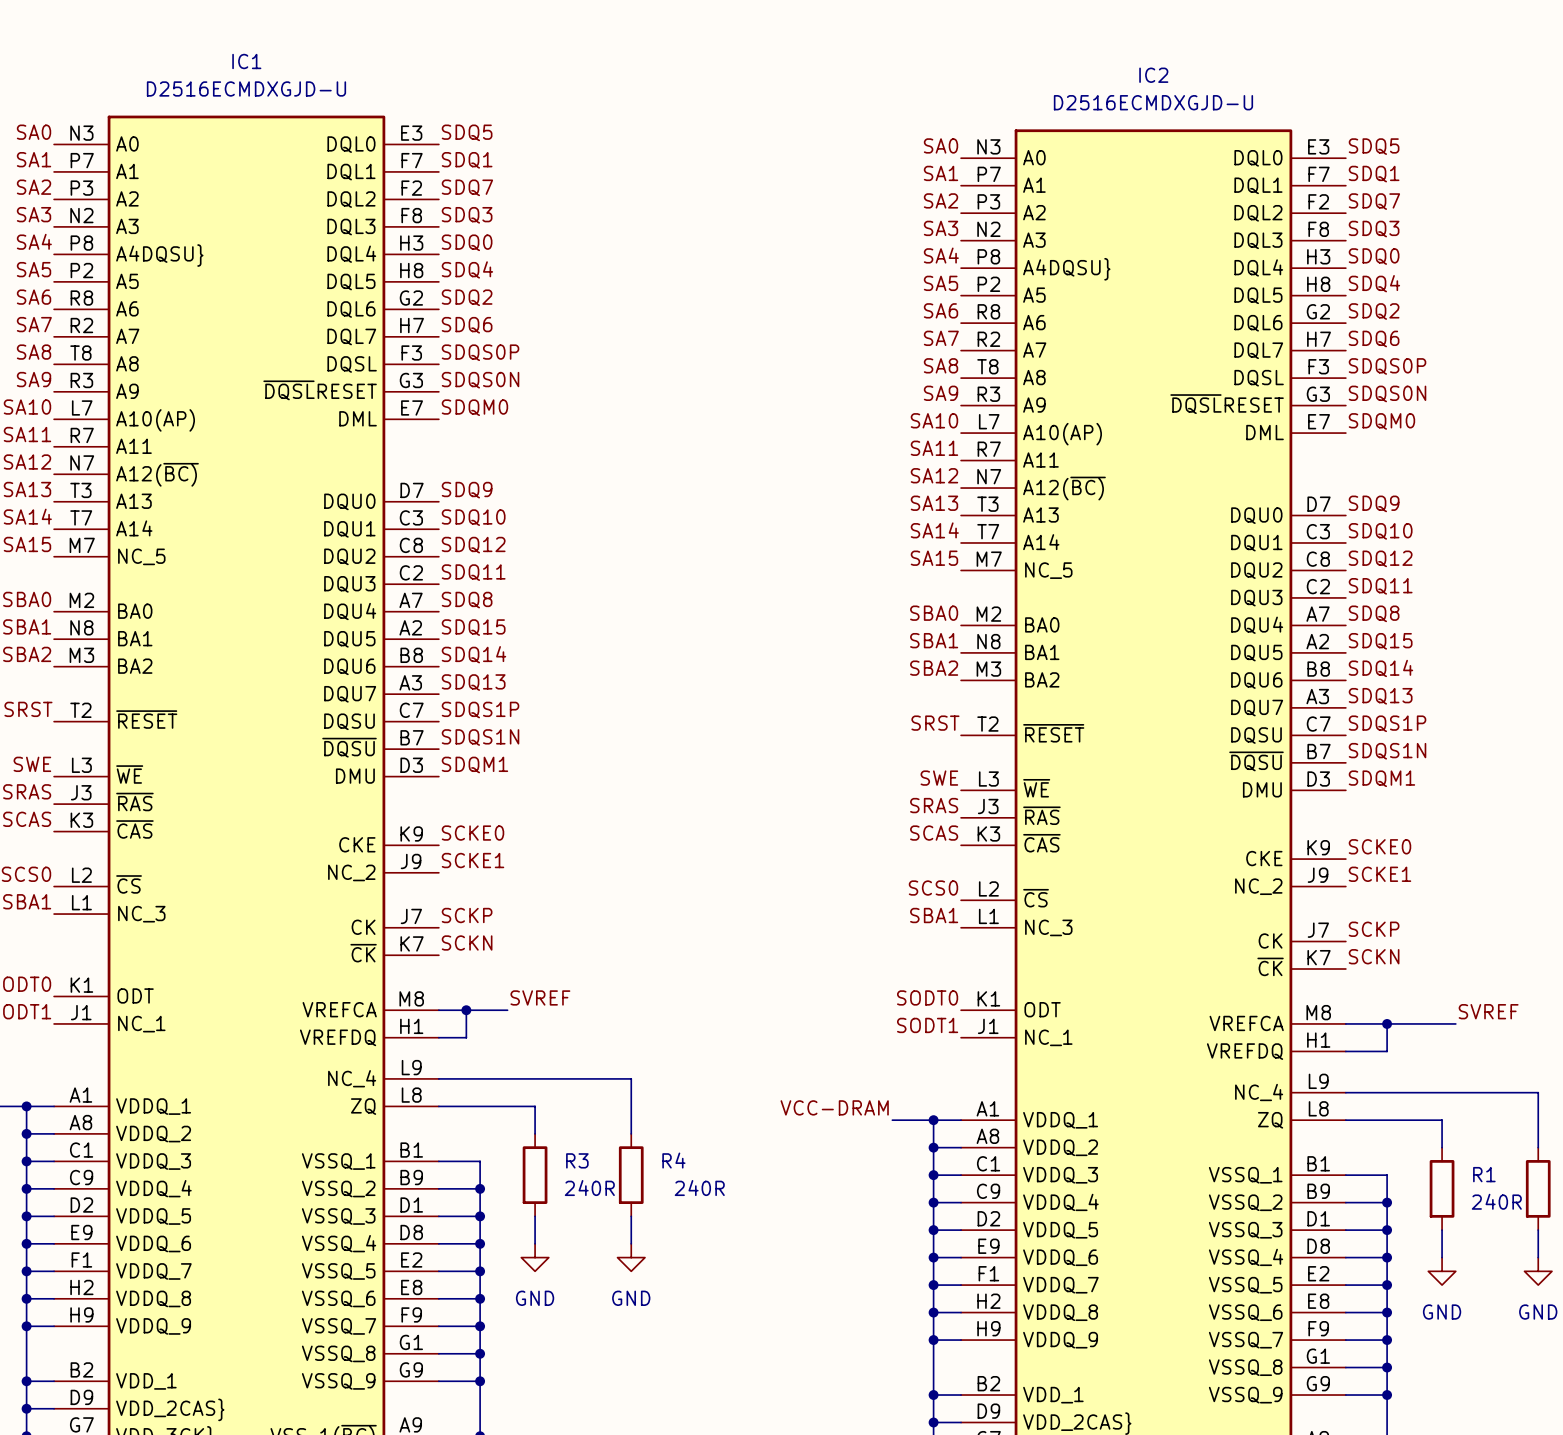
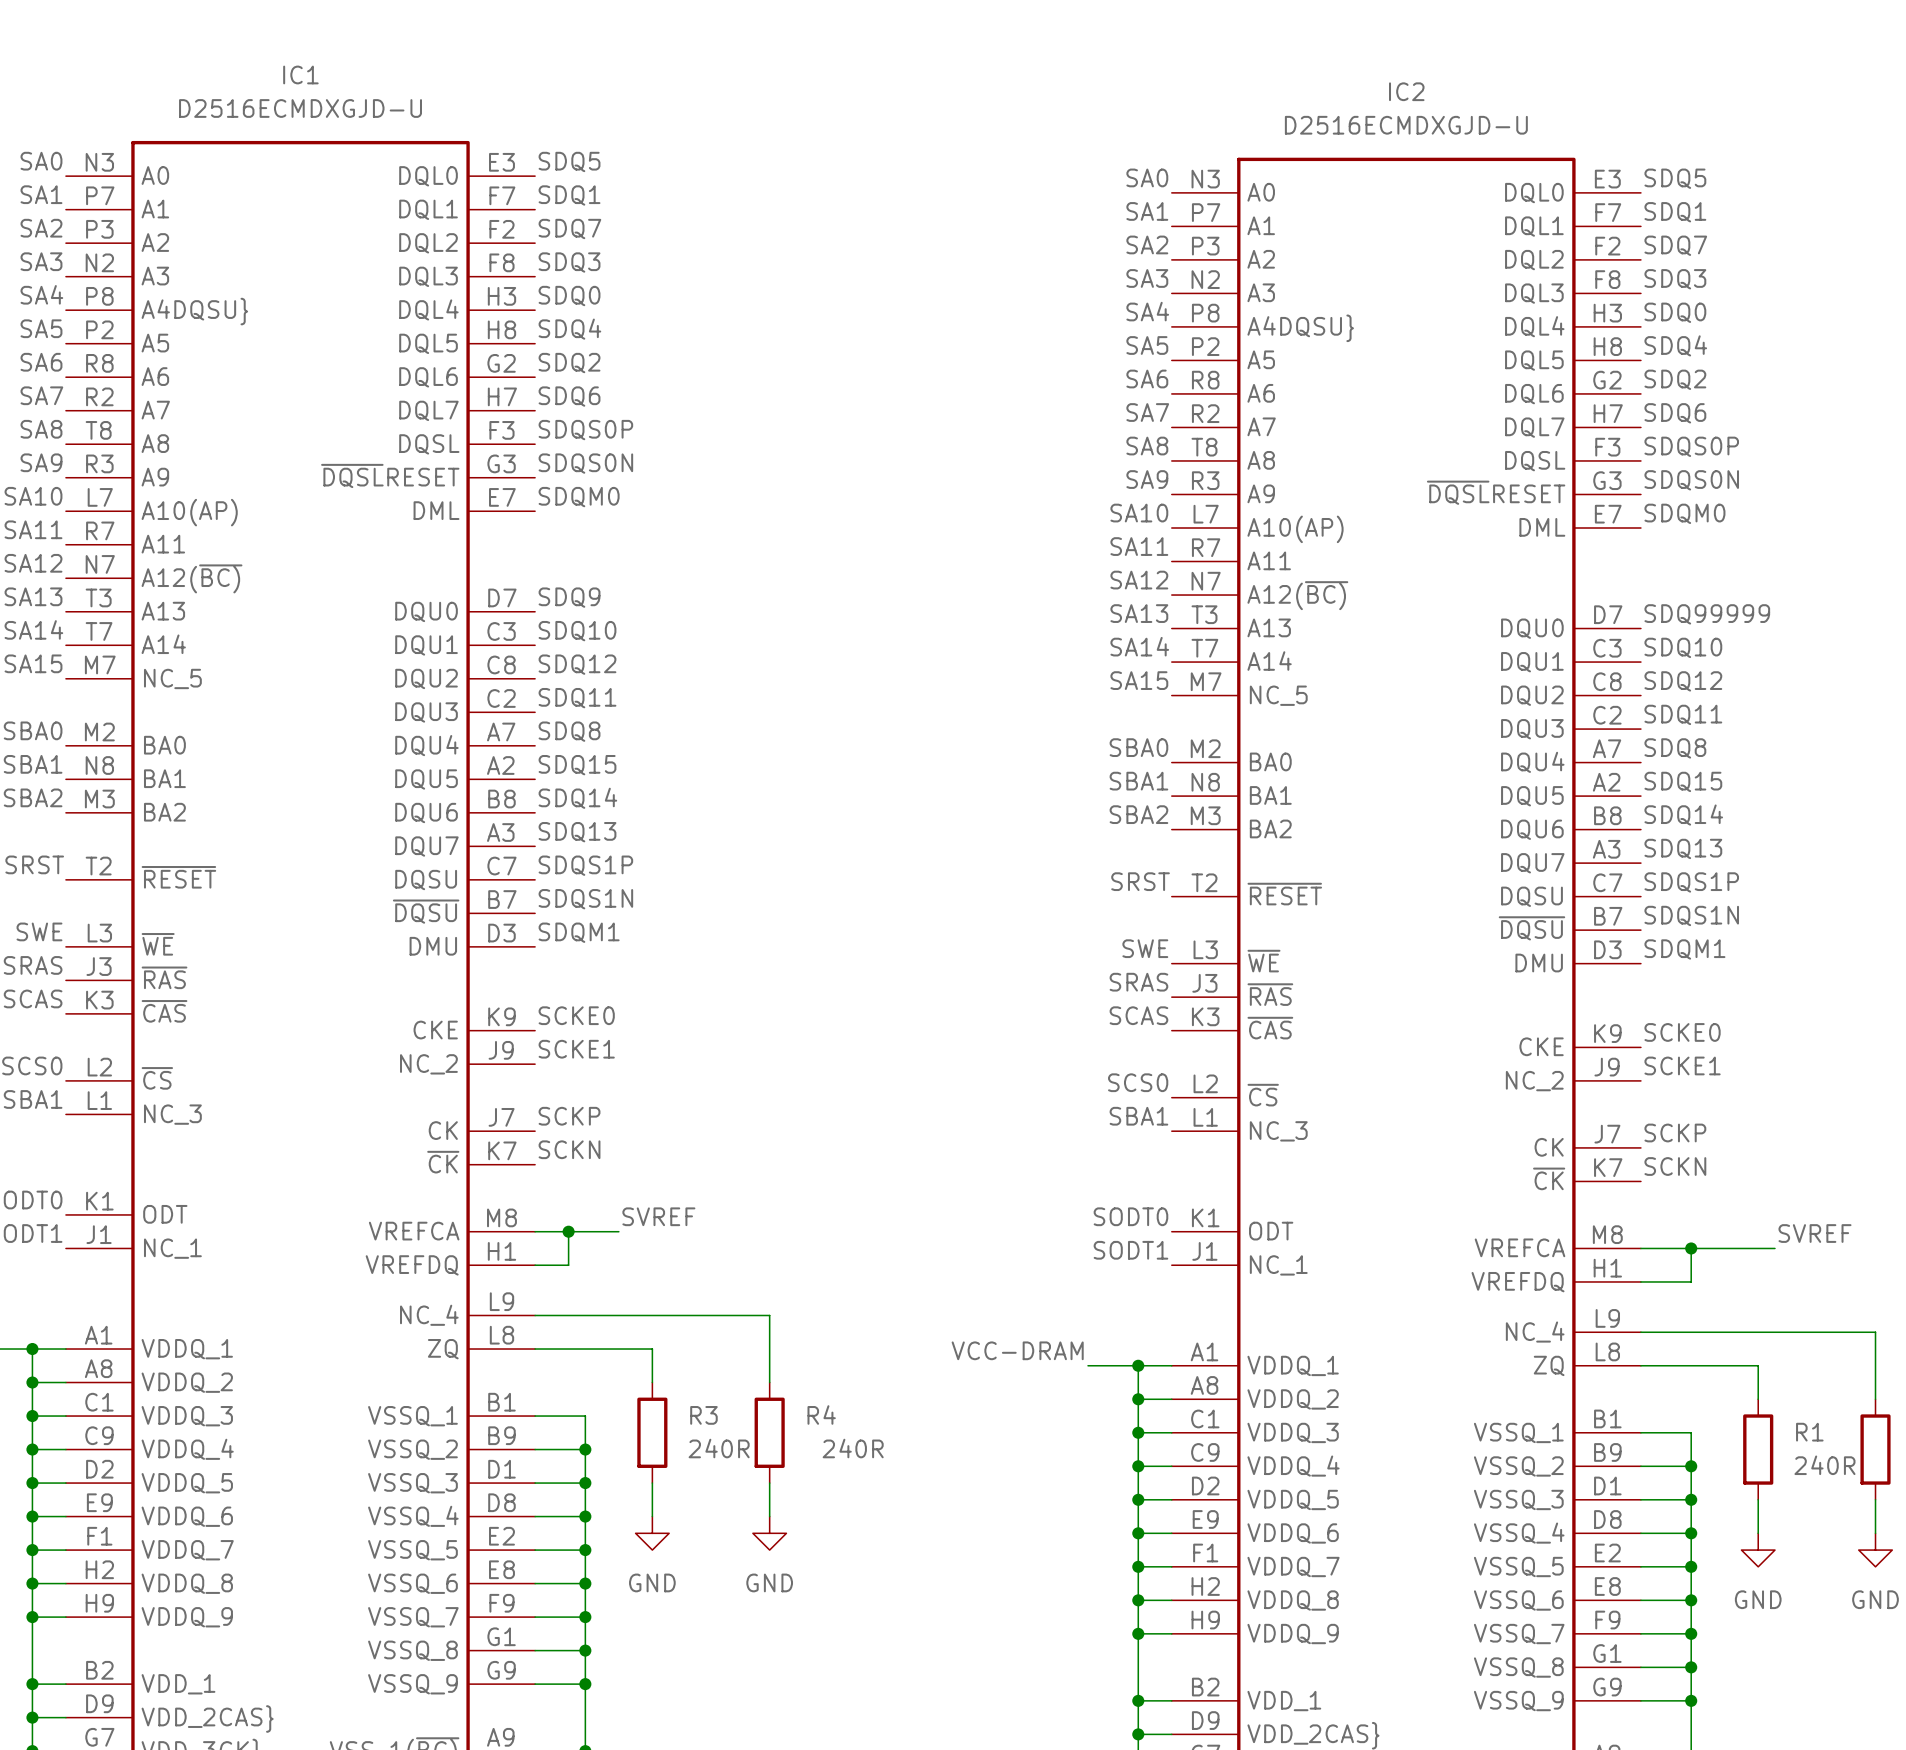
label: SDQ9 (1374, 503) -> SDQ99999 (1707, 614)

